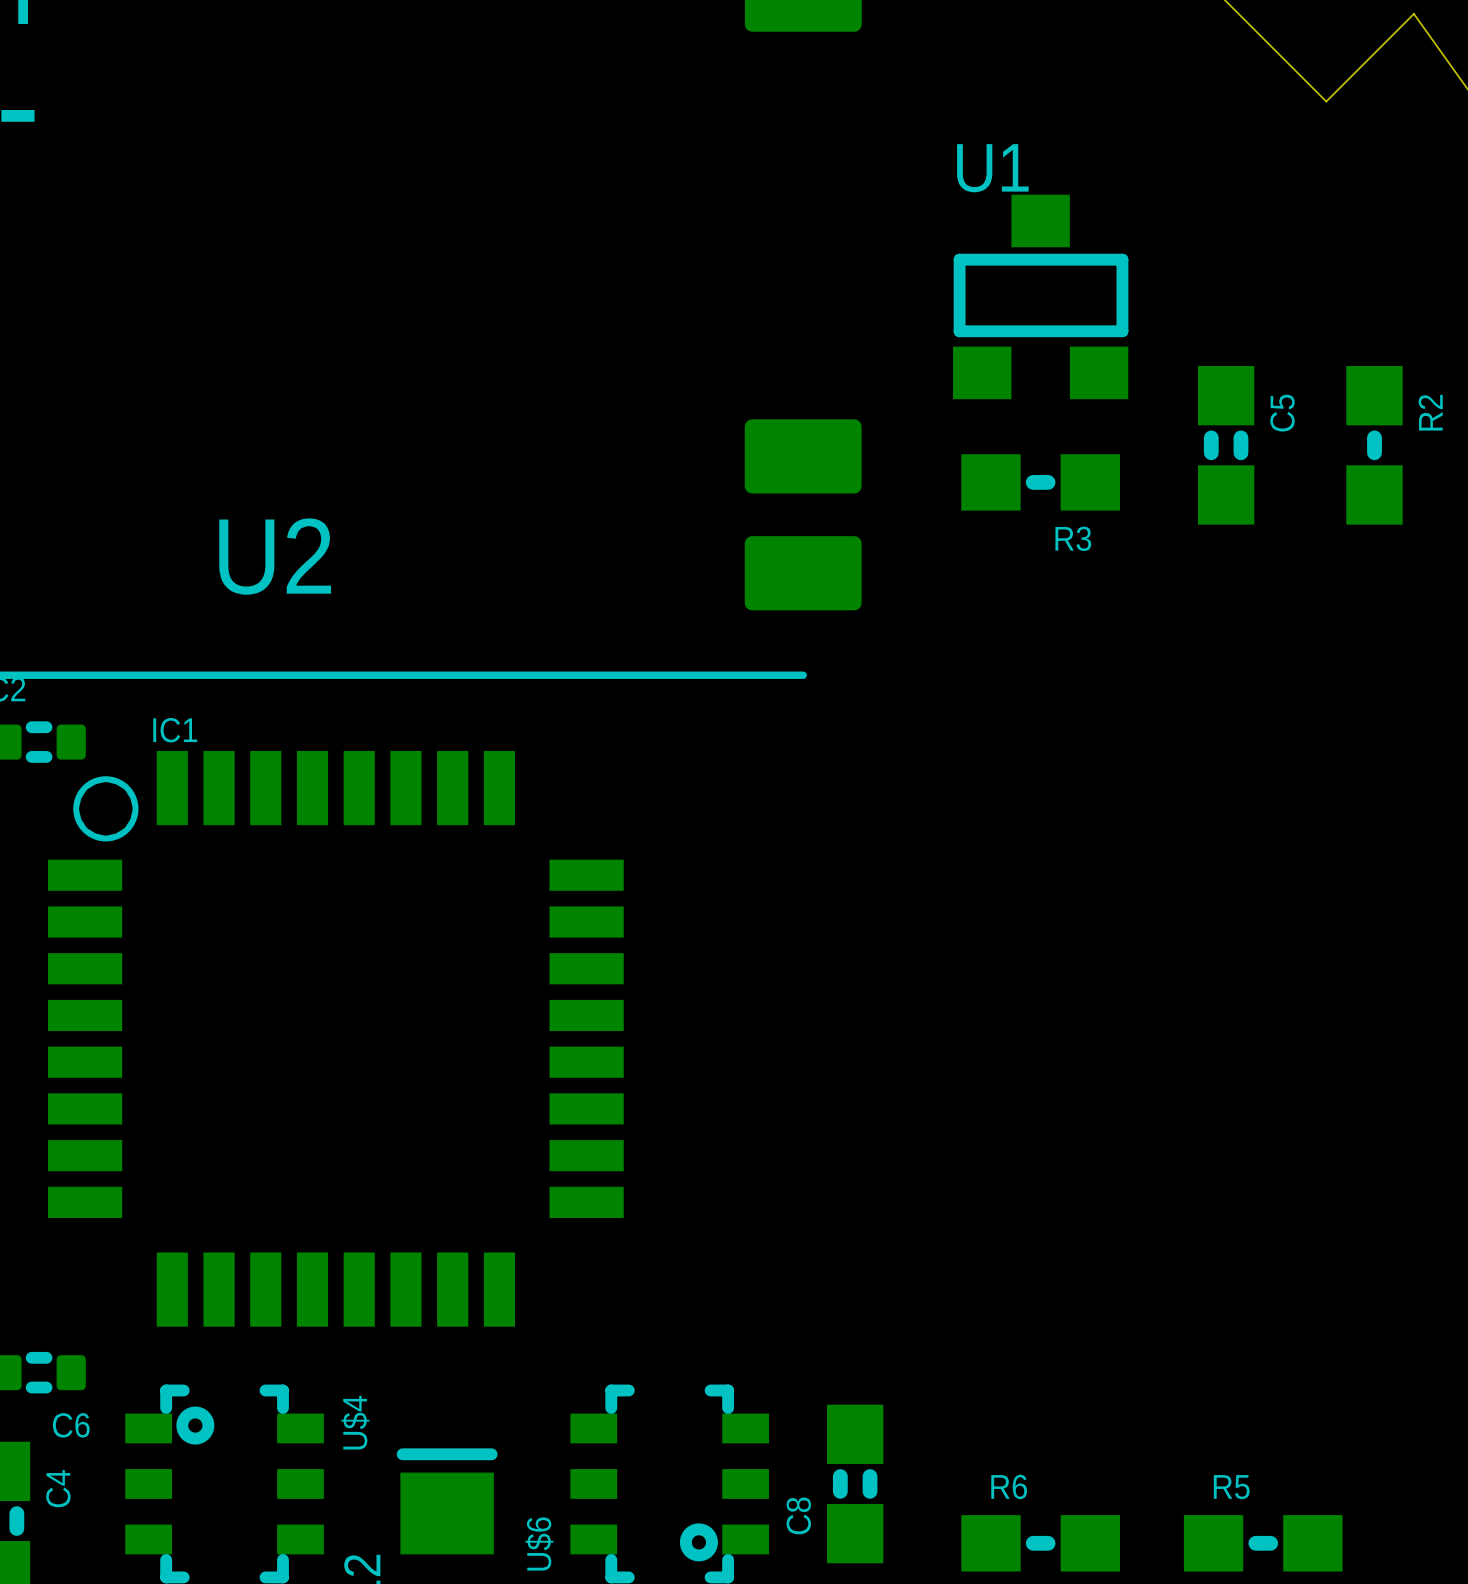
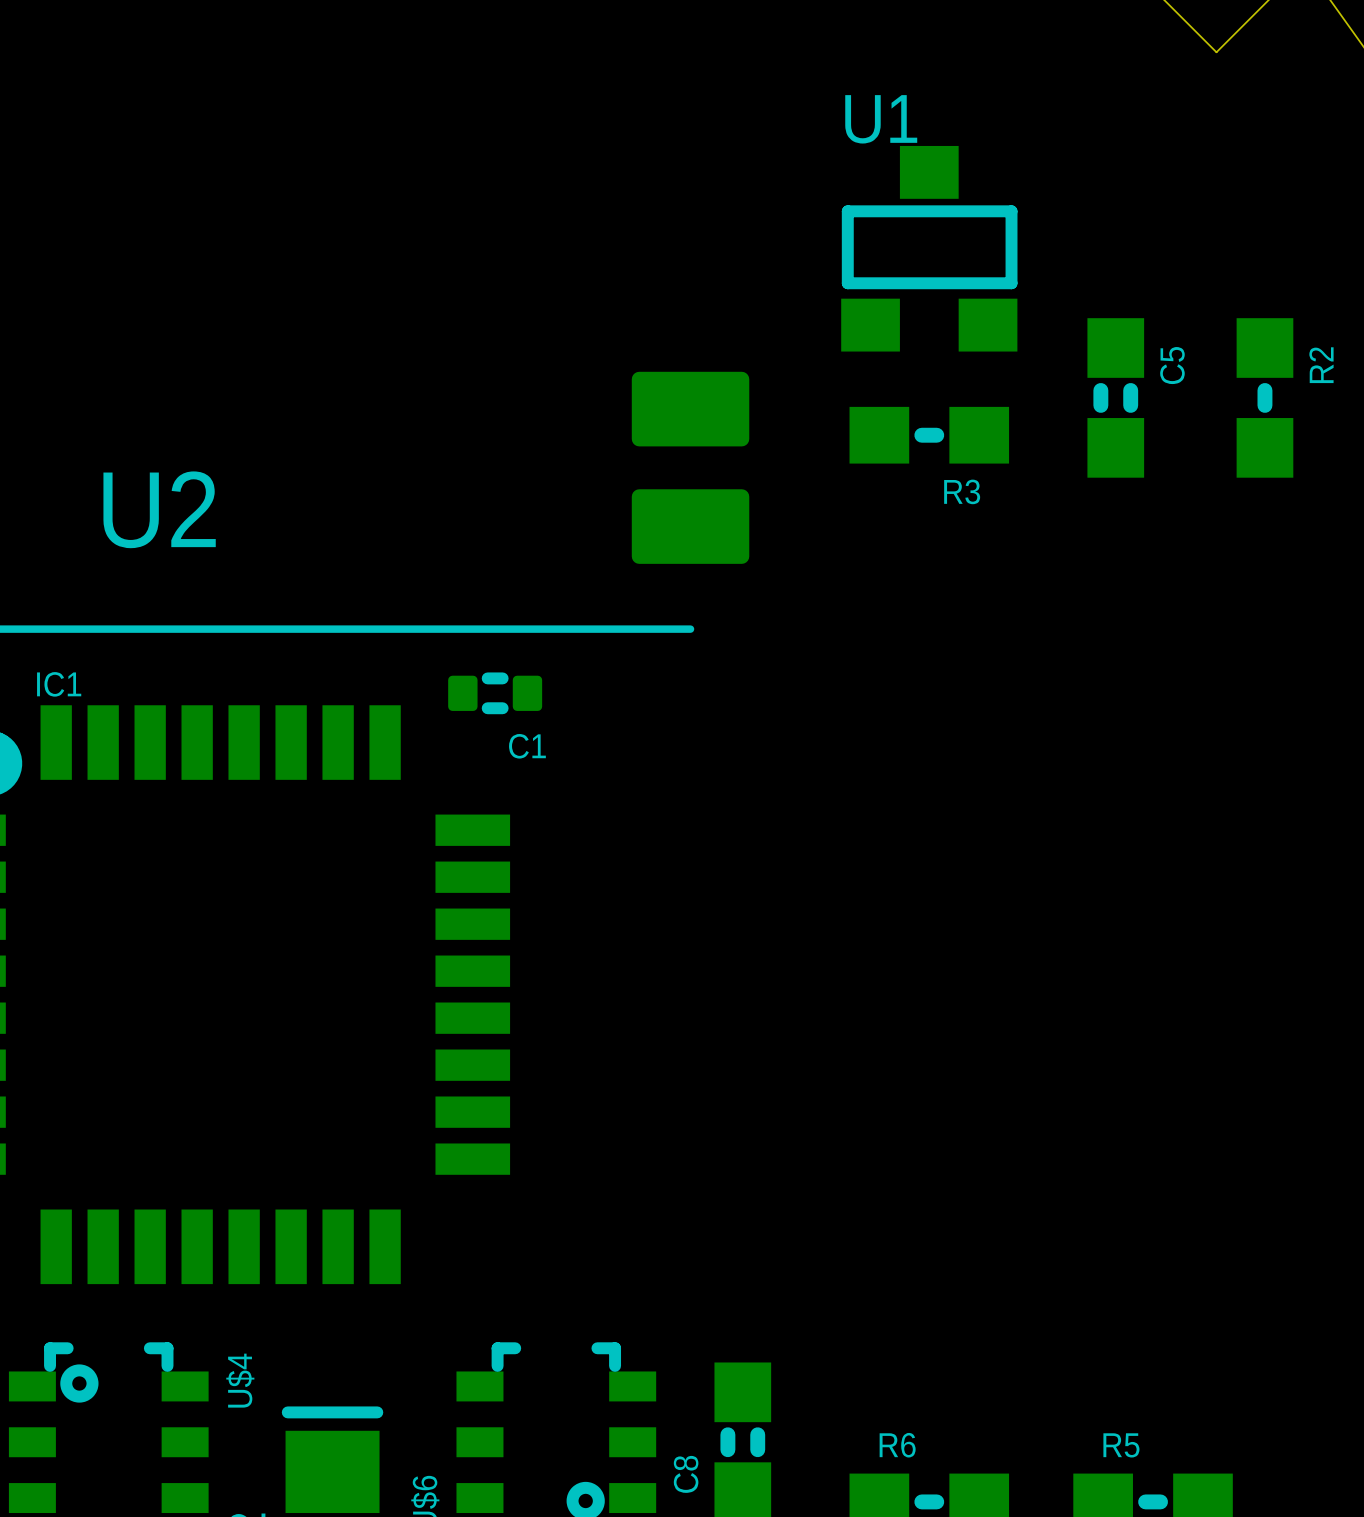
C1: none -> (495, 693)

